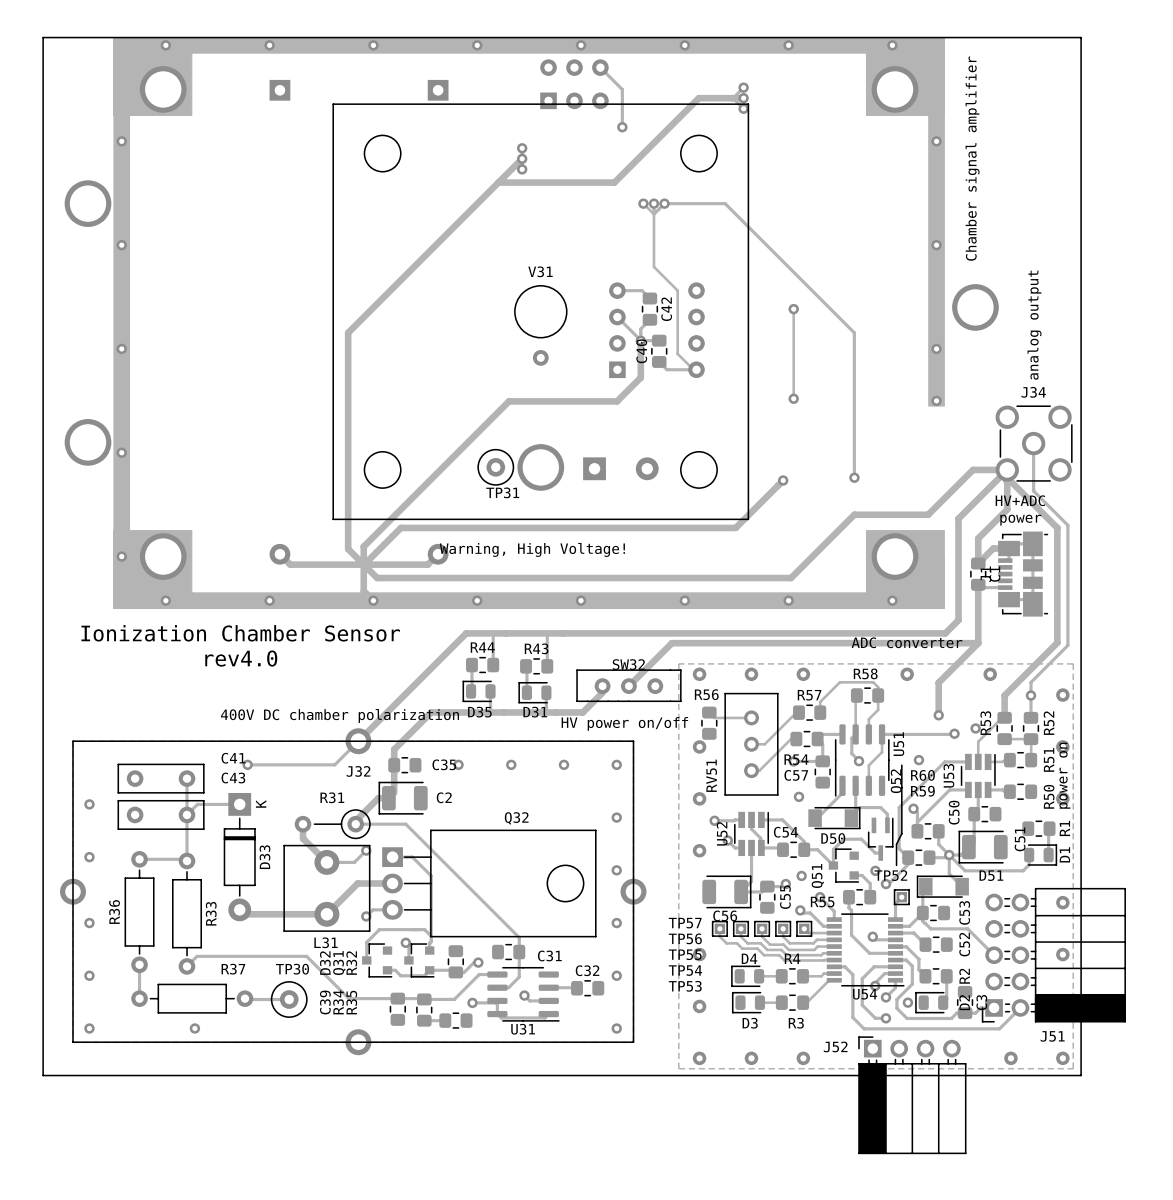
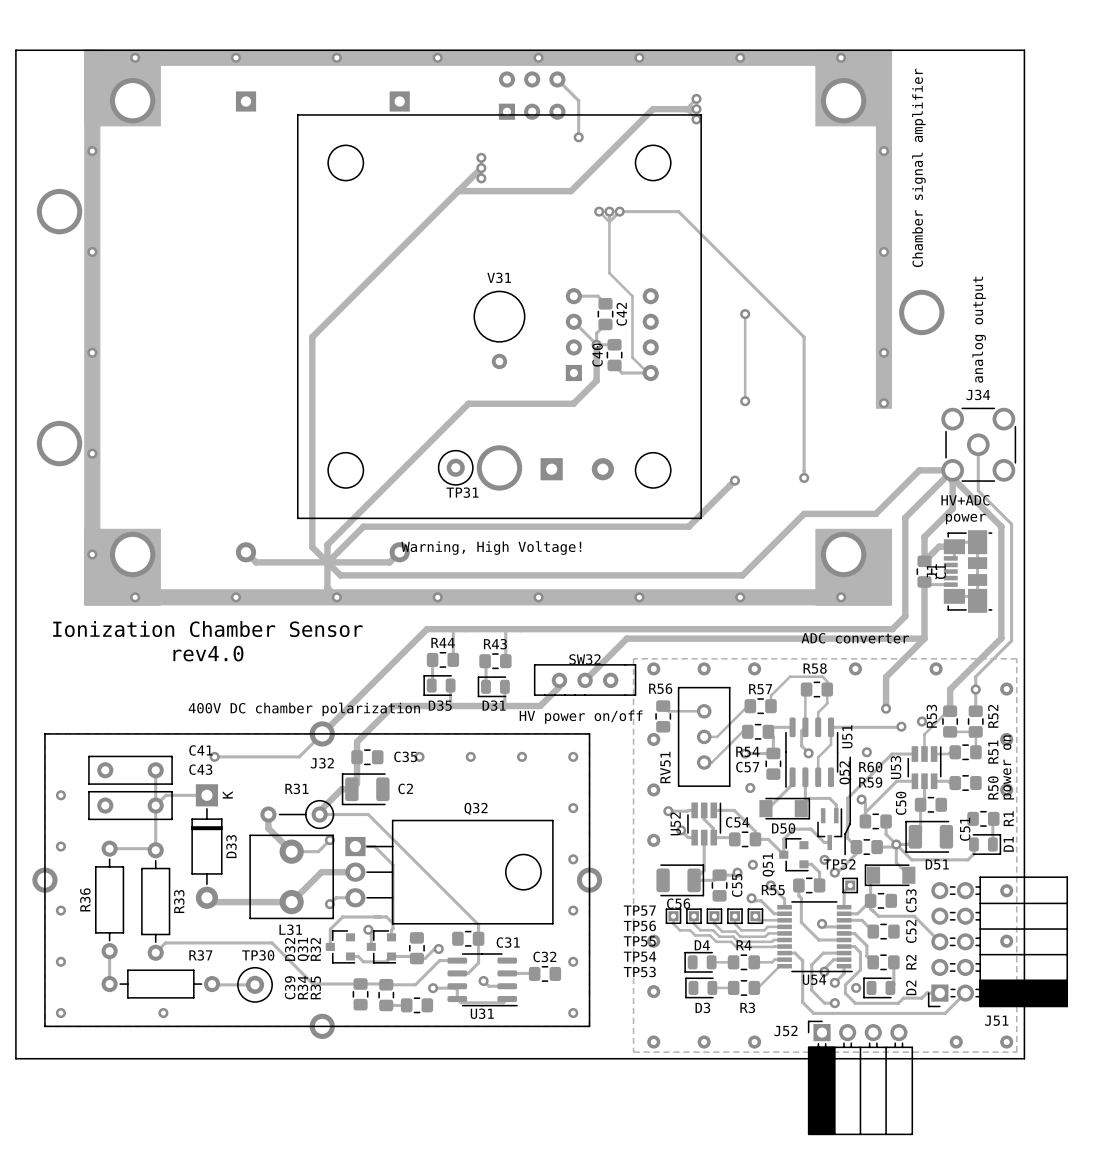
C3: (965, 1002) -> none

